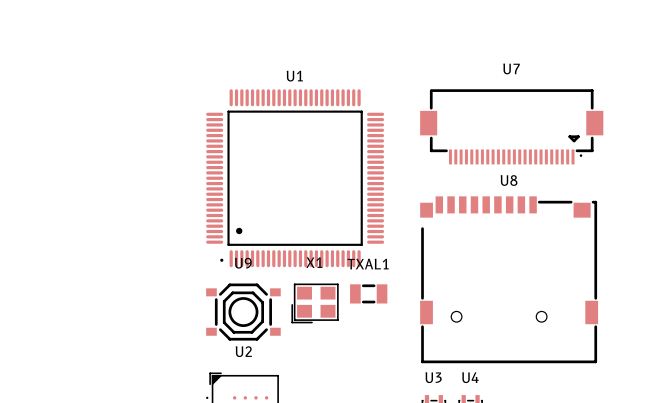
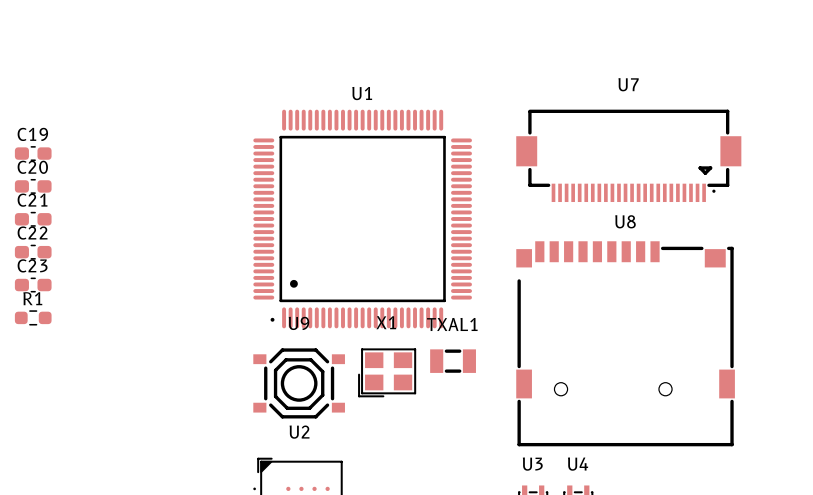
C19: none -> (33, 153)
C20: none -> (33, 186)
C21: none -> (33, 219)
C22: none -> (33, 252)
C23: none -> (33, 285)
R1: none -> (33, 317)

